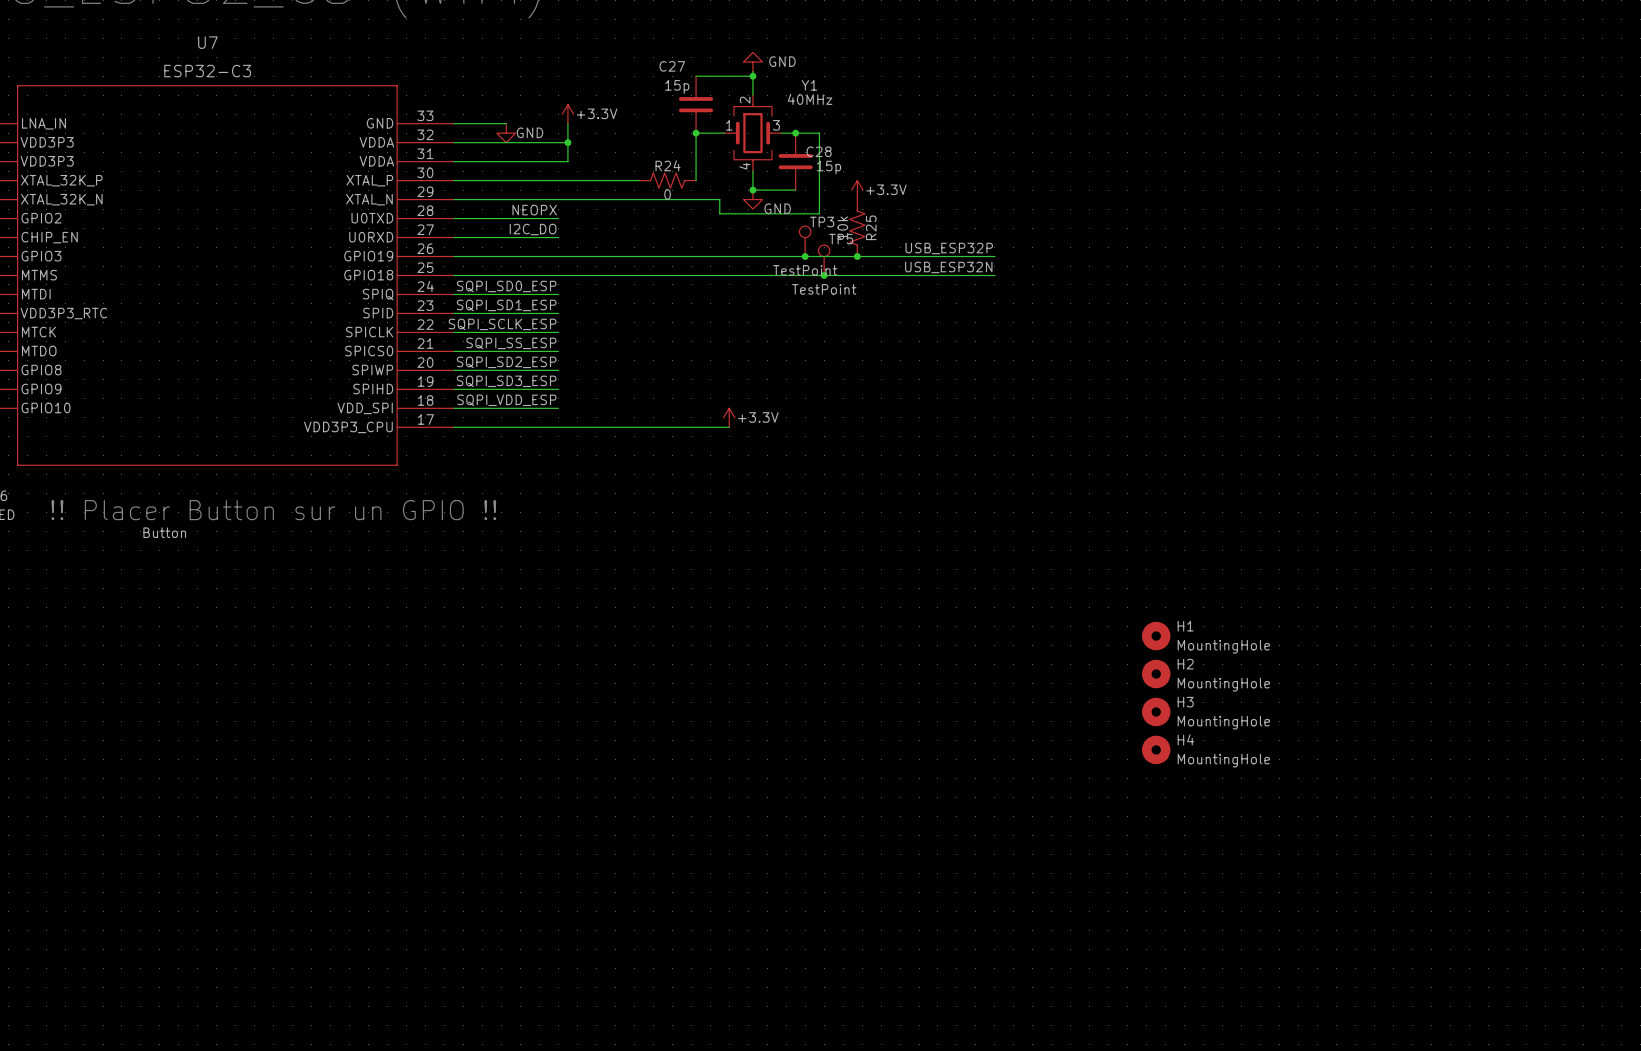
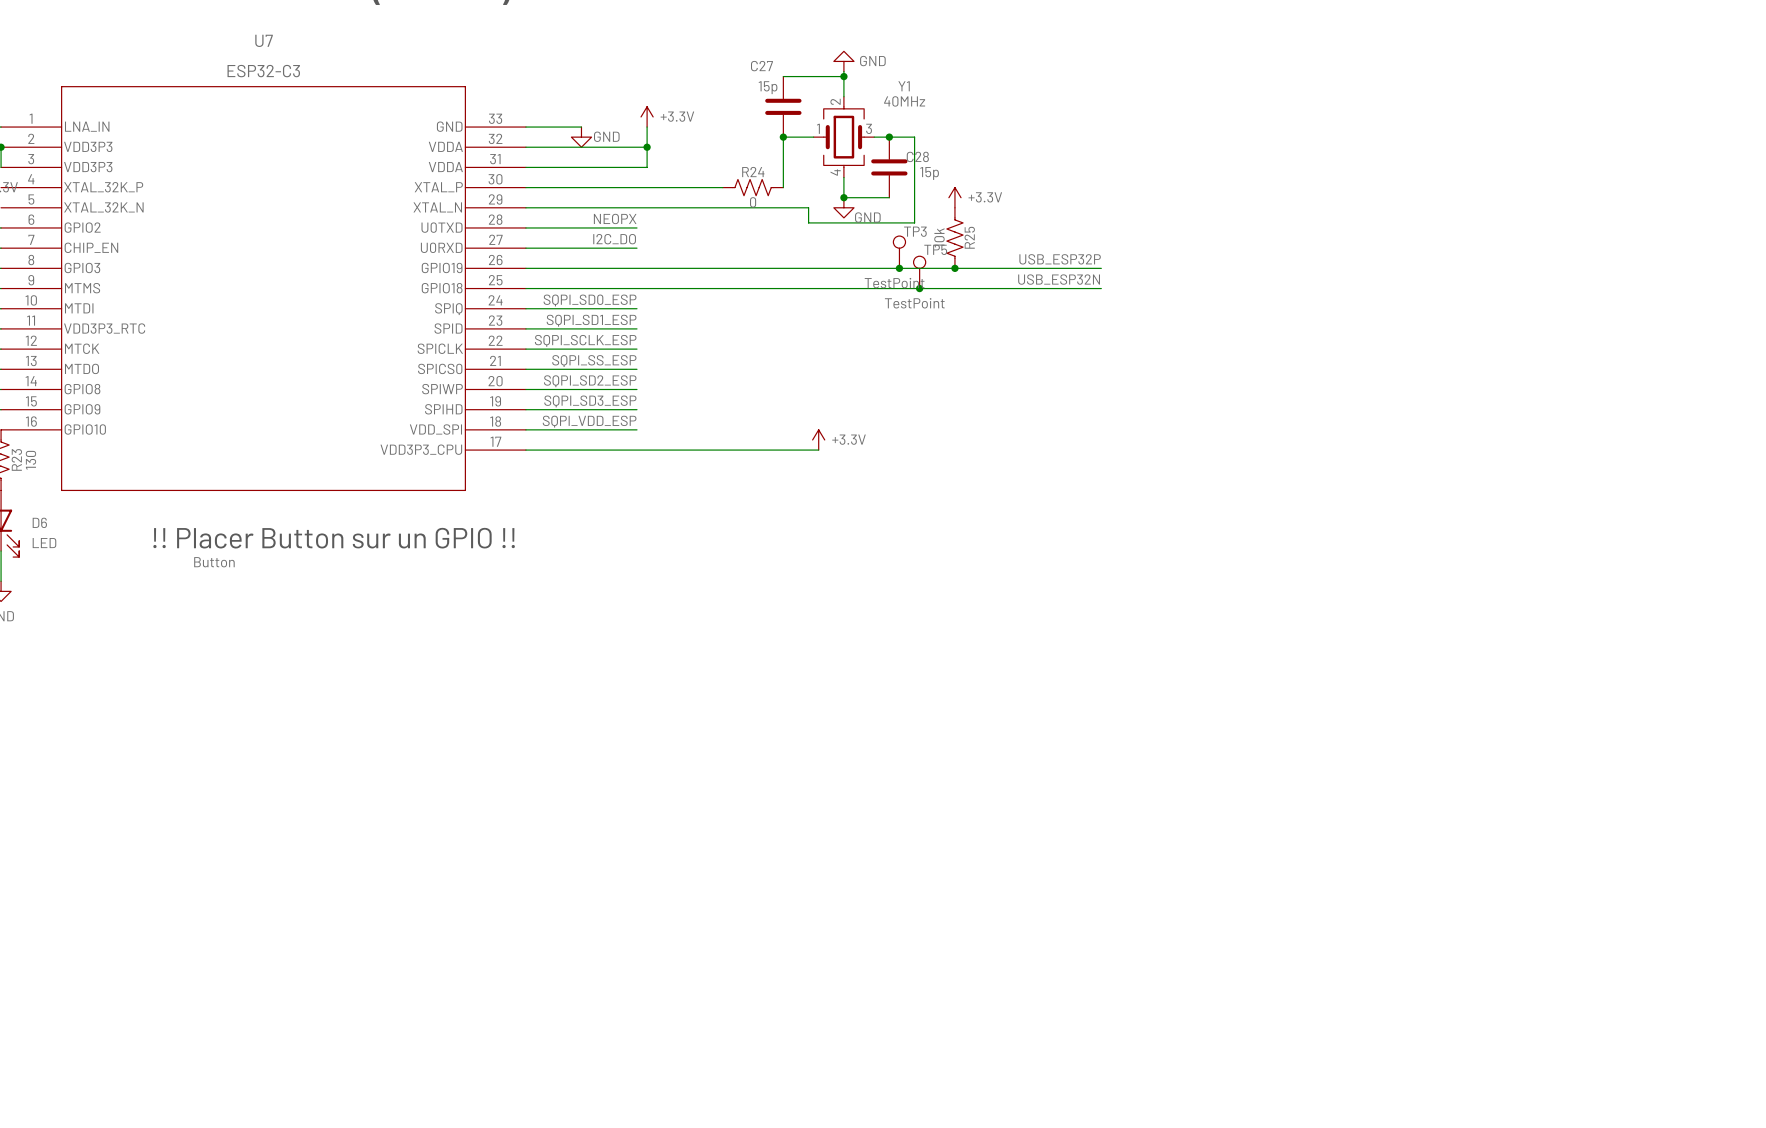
H1: MountingHole (1156, 636) -> none
H2: MountingHole (1156, 674) -> none
H3: MountingHole (1156, 711) -> none
H4: MountingHole (1156, 749) -> none

